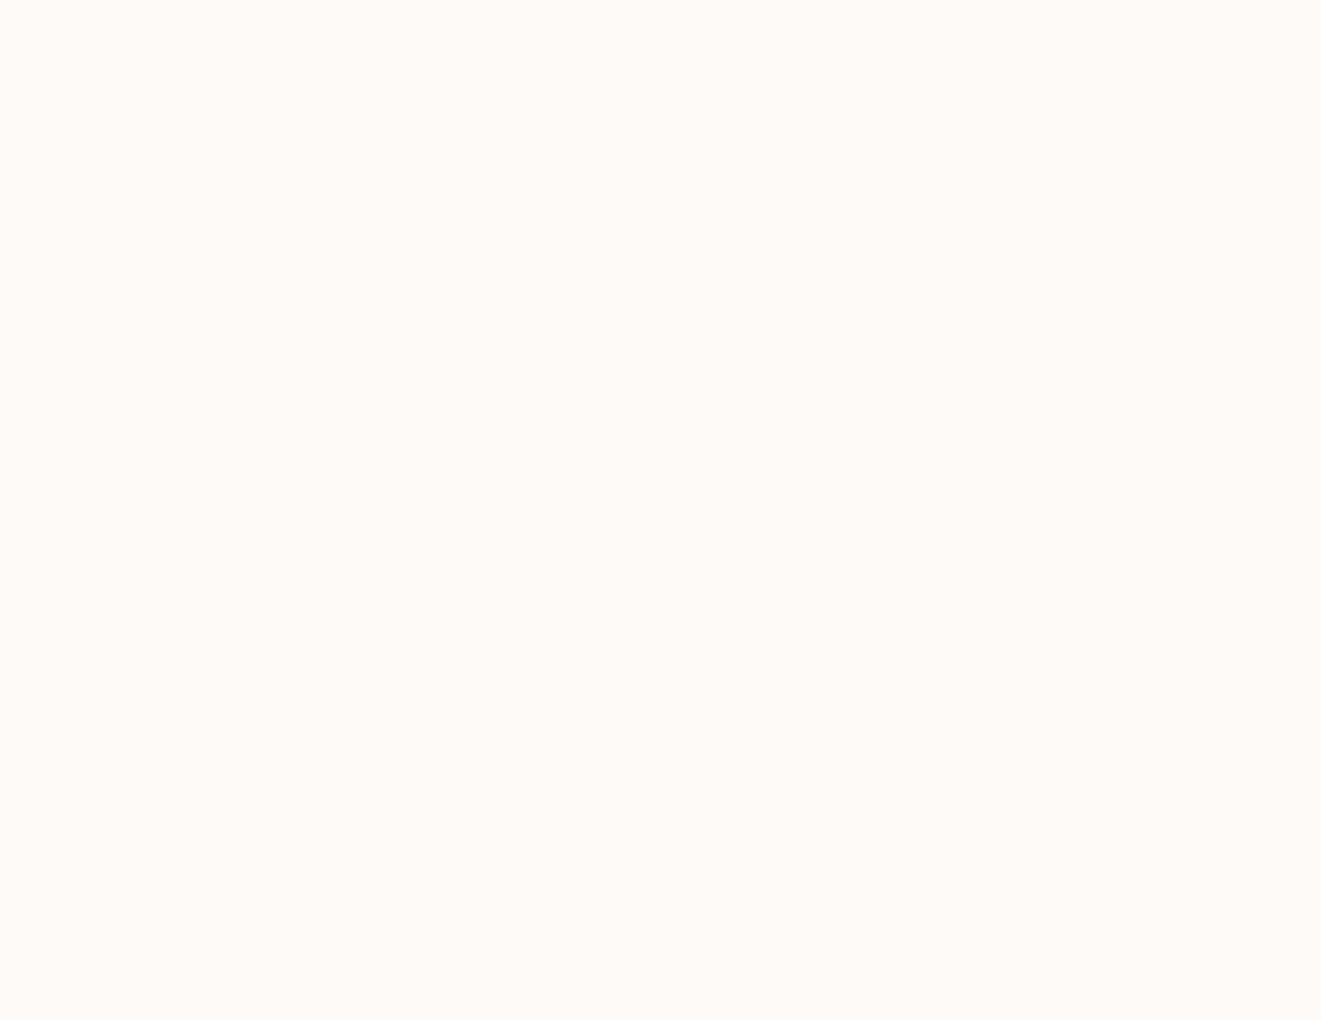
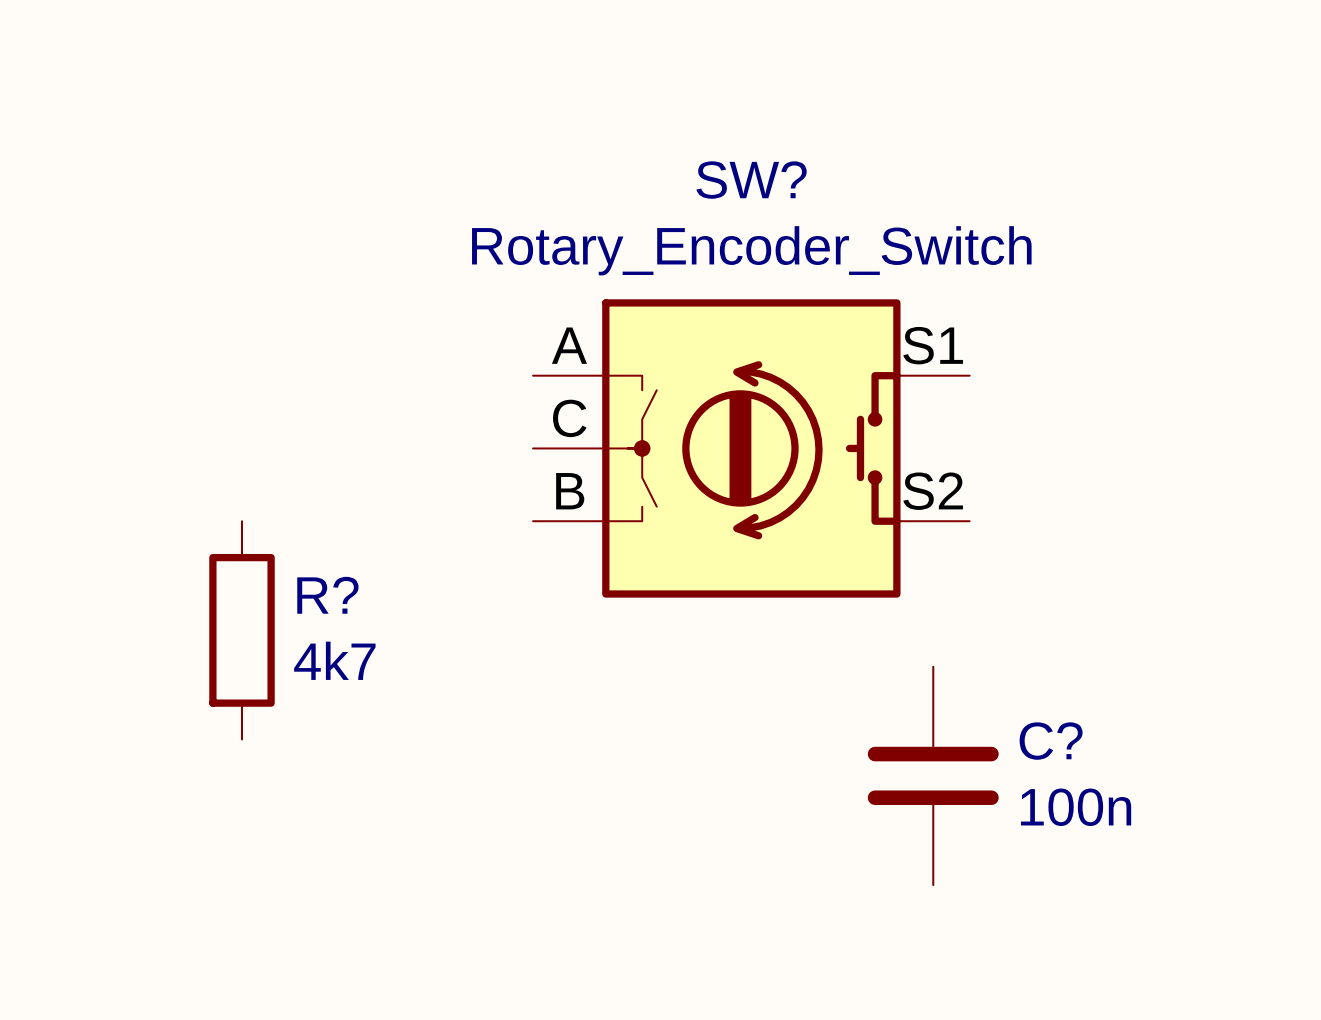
SW?: none -> Rotary_Encoder_Switch (751, 448)
R?: none -> 4k7 (241, 630)
C?: none -> 100n (933, 775)

